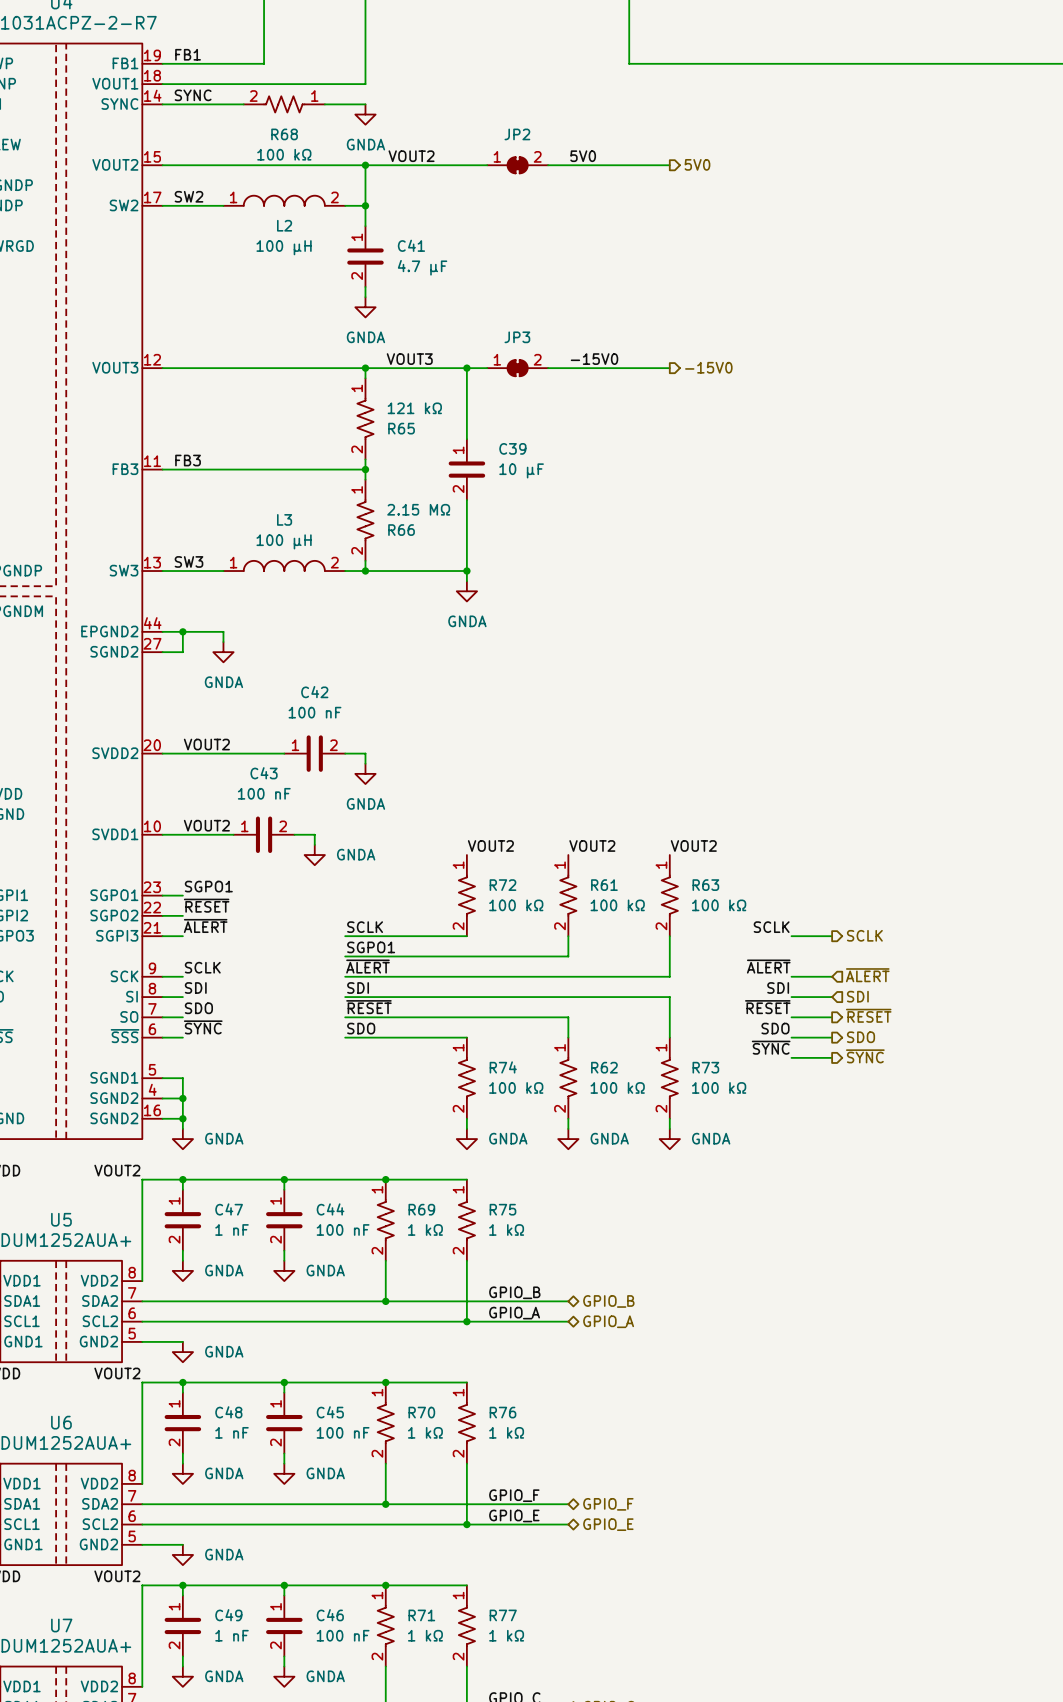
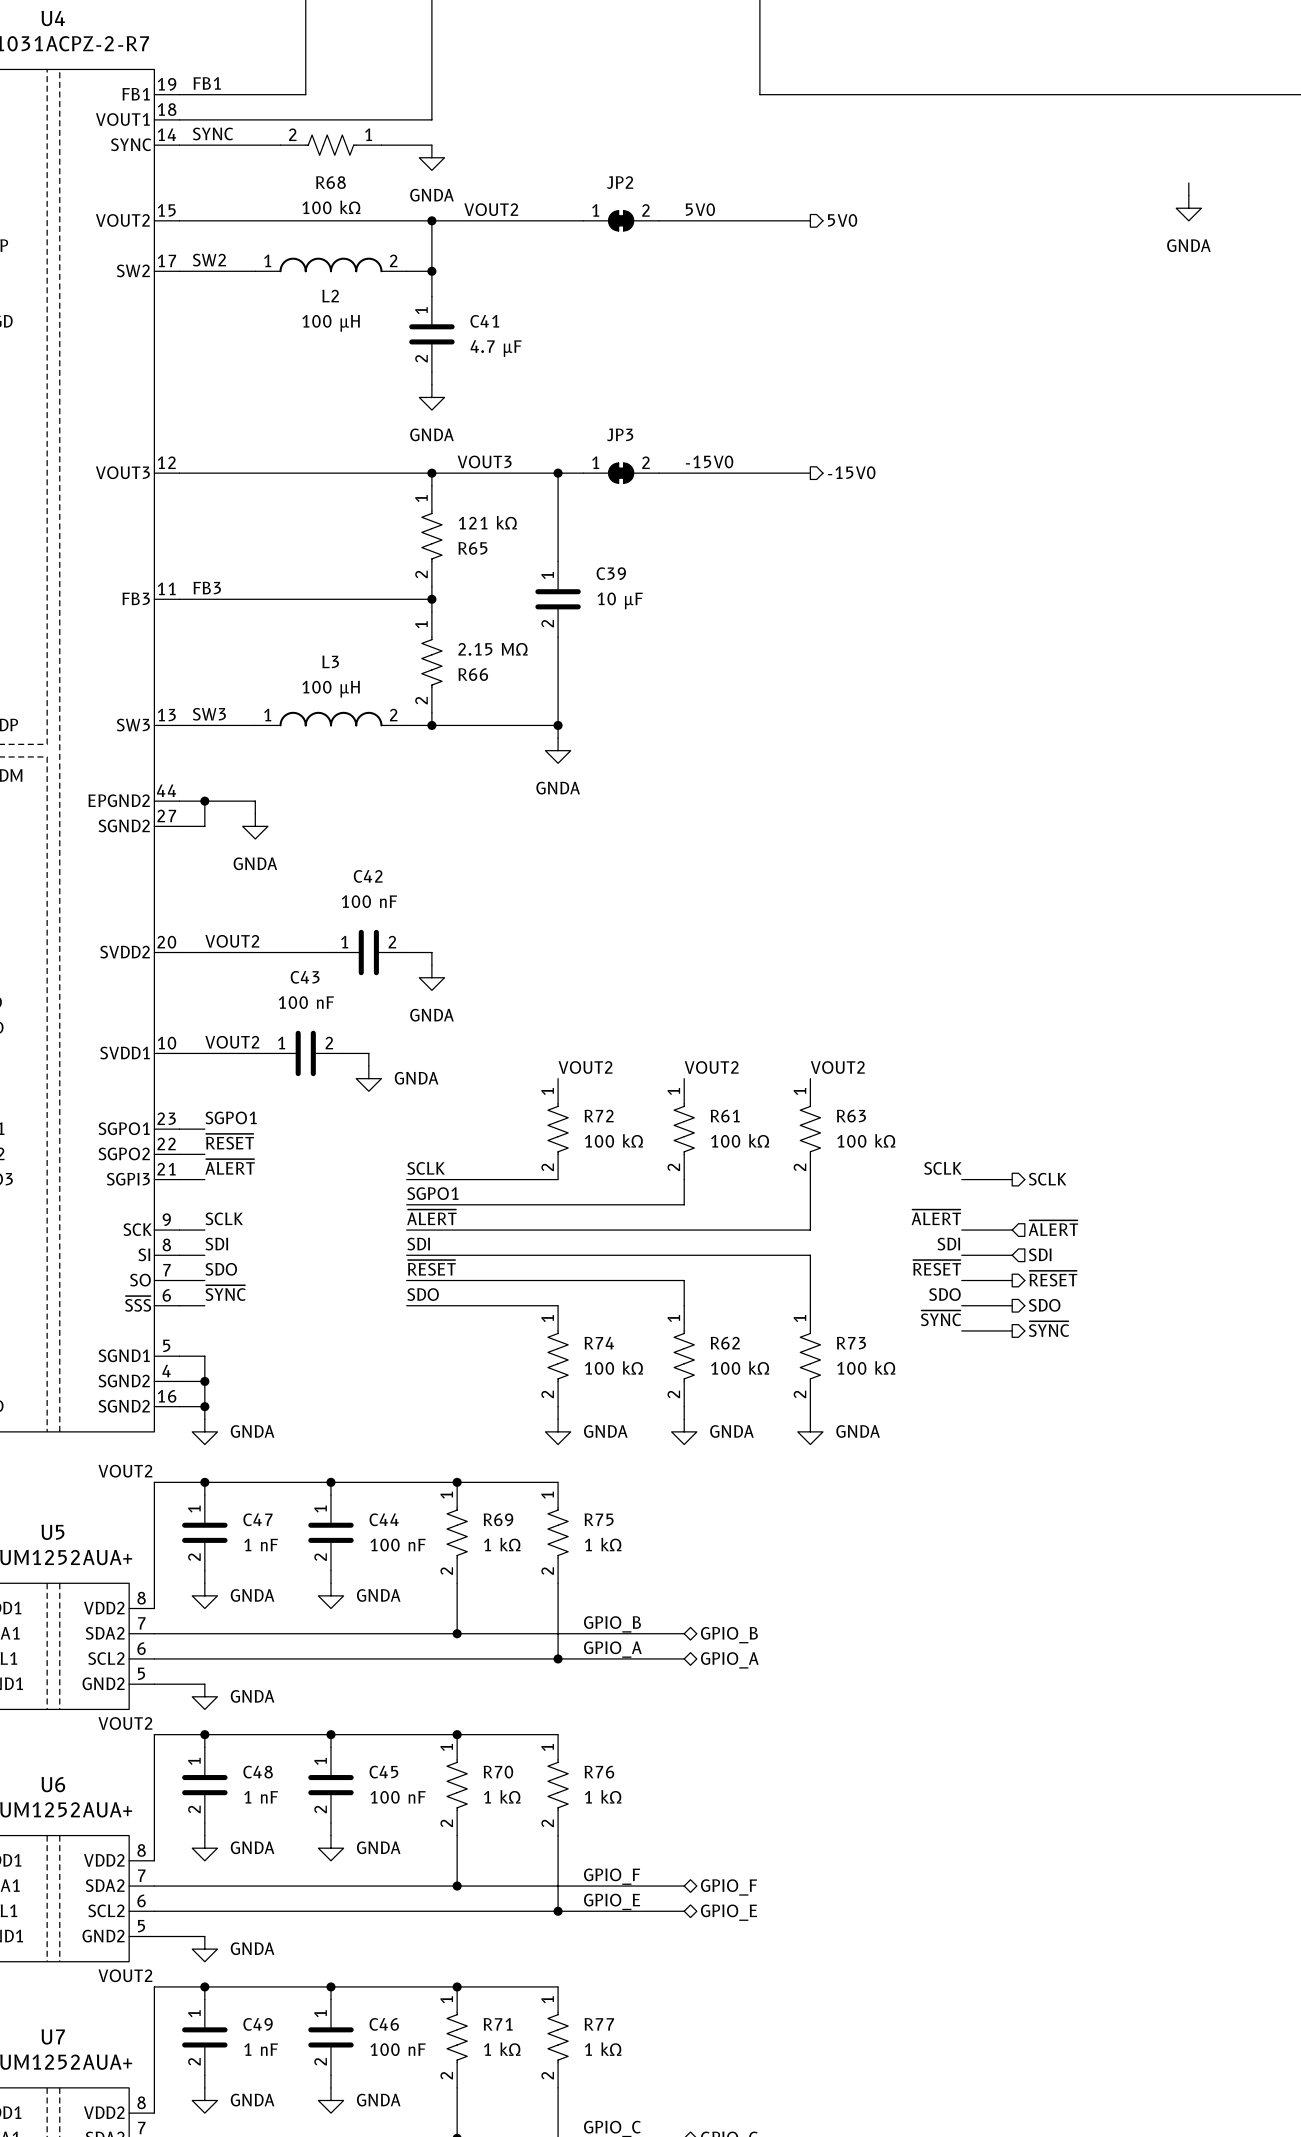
wire: none -> (1188, 182) (1188, 195)
power symbol: none -> GNDA (1188, 208)

